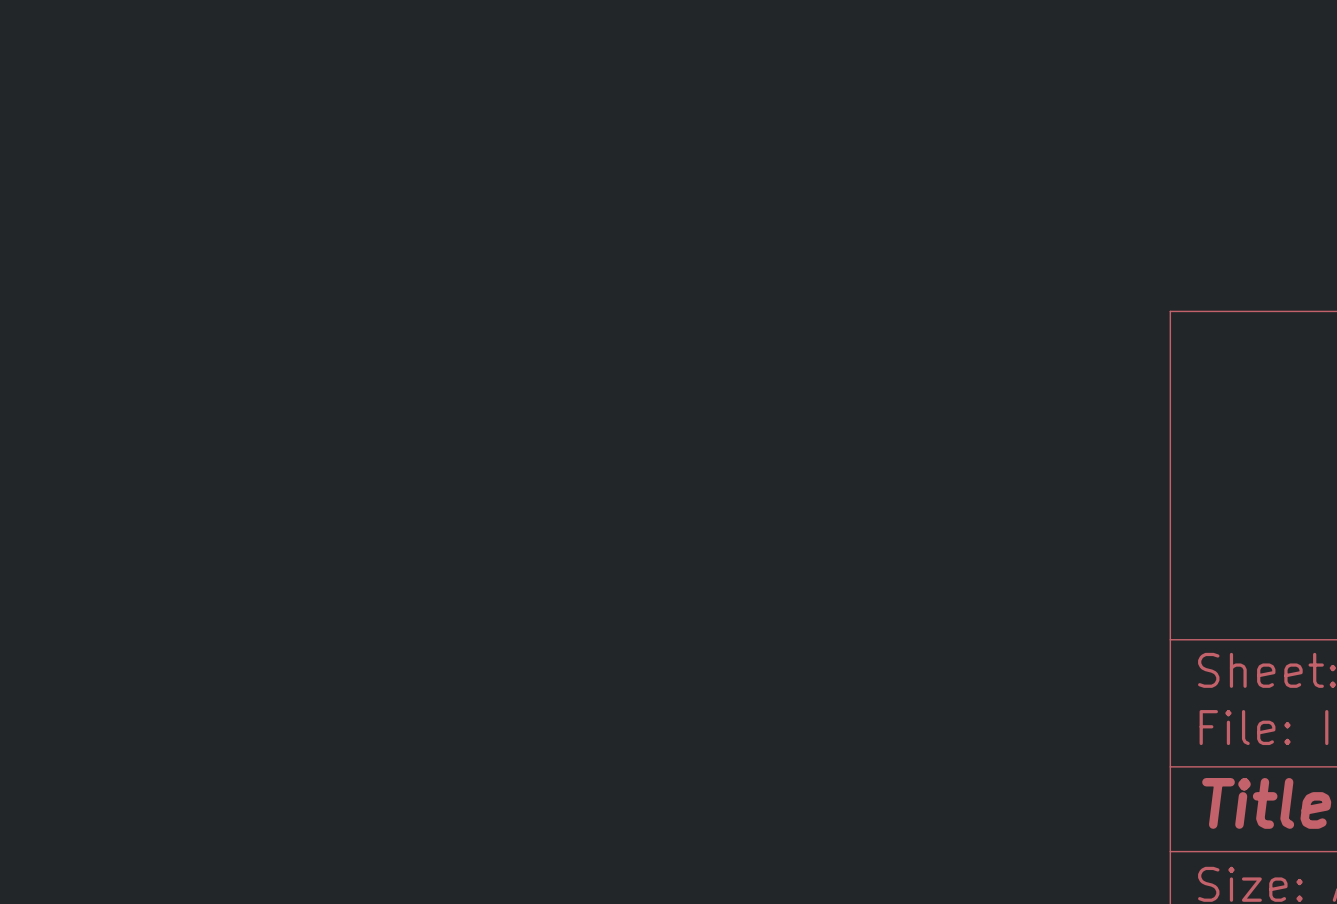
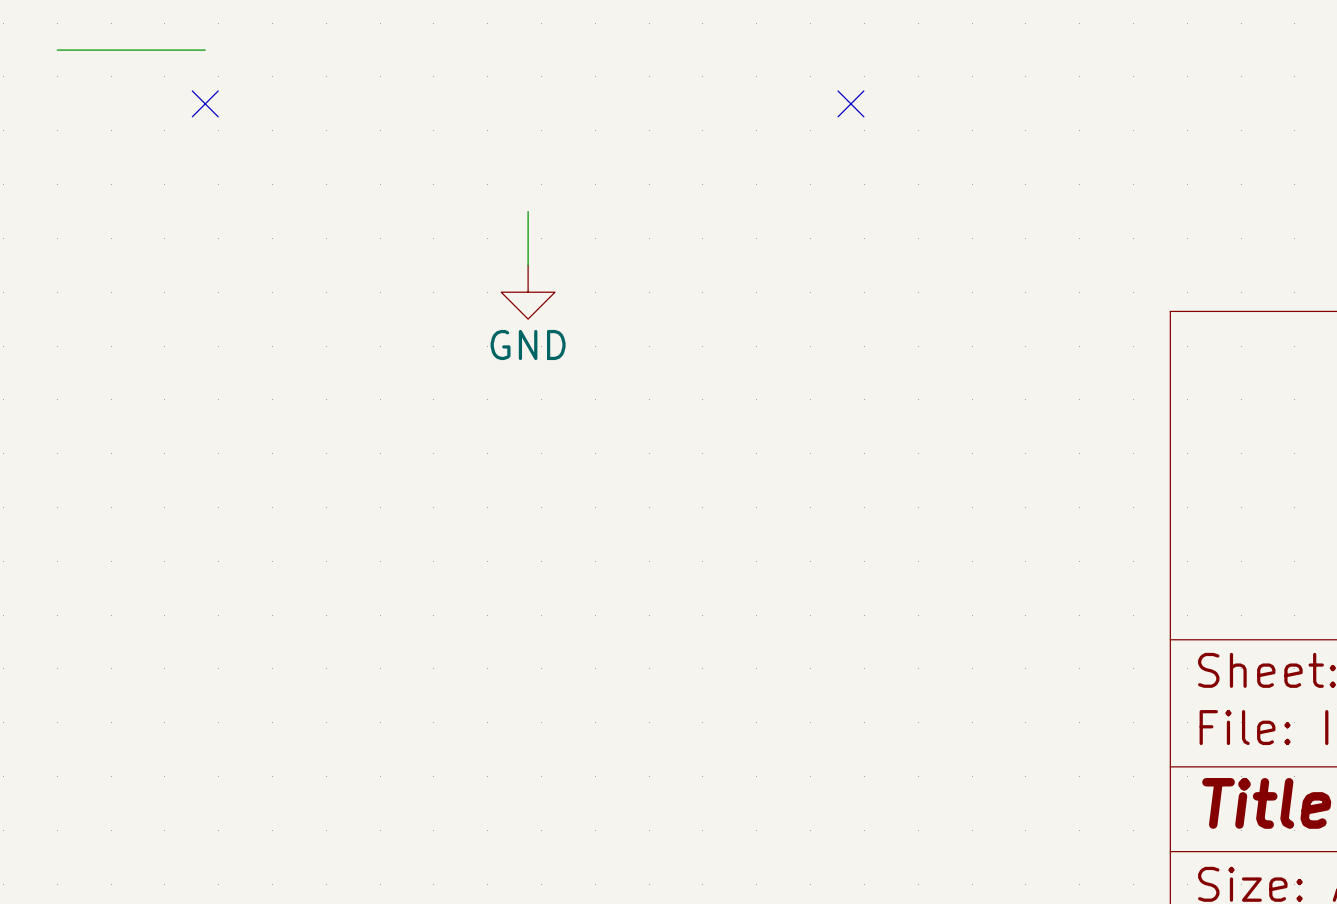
wire: none -> (57, 50) (205, 50)
no-connect mark: none -> (205, 103)
no-connect mark: none -> (850, 103)
wire: none -> (528, 211) (528, 265)
power symbol: none -> GND (528, 292)

